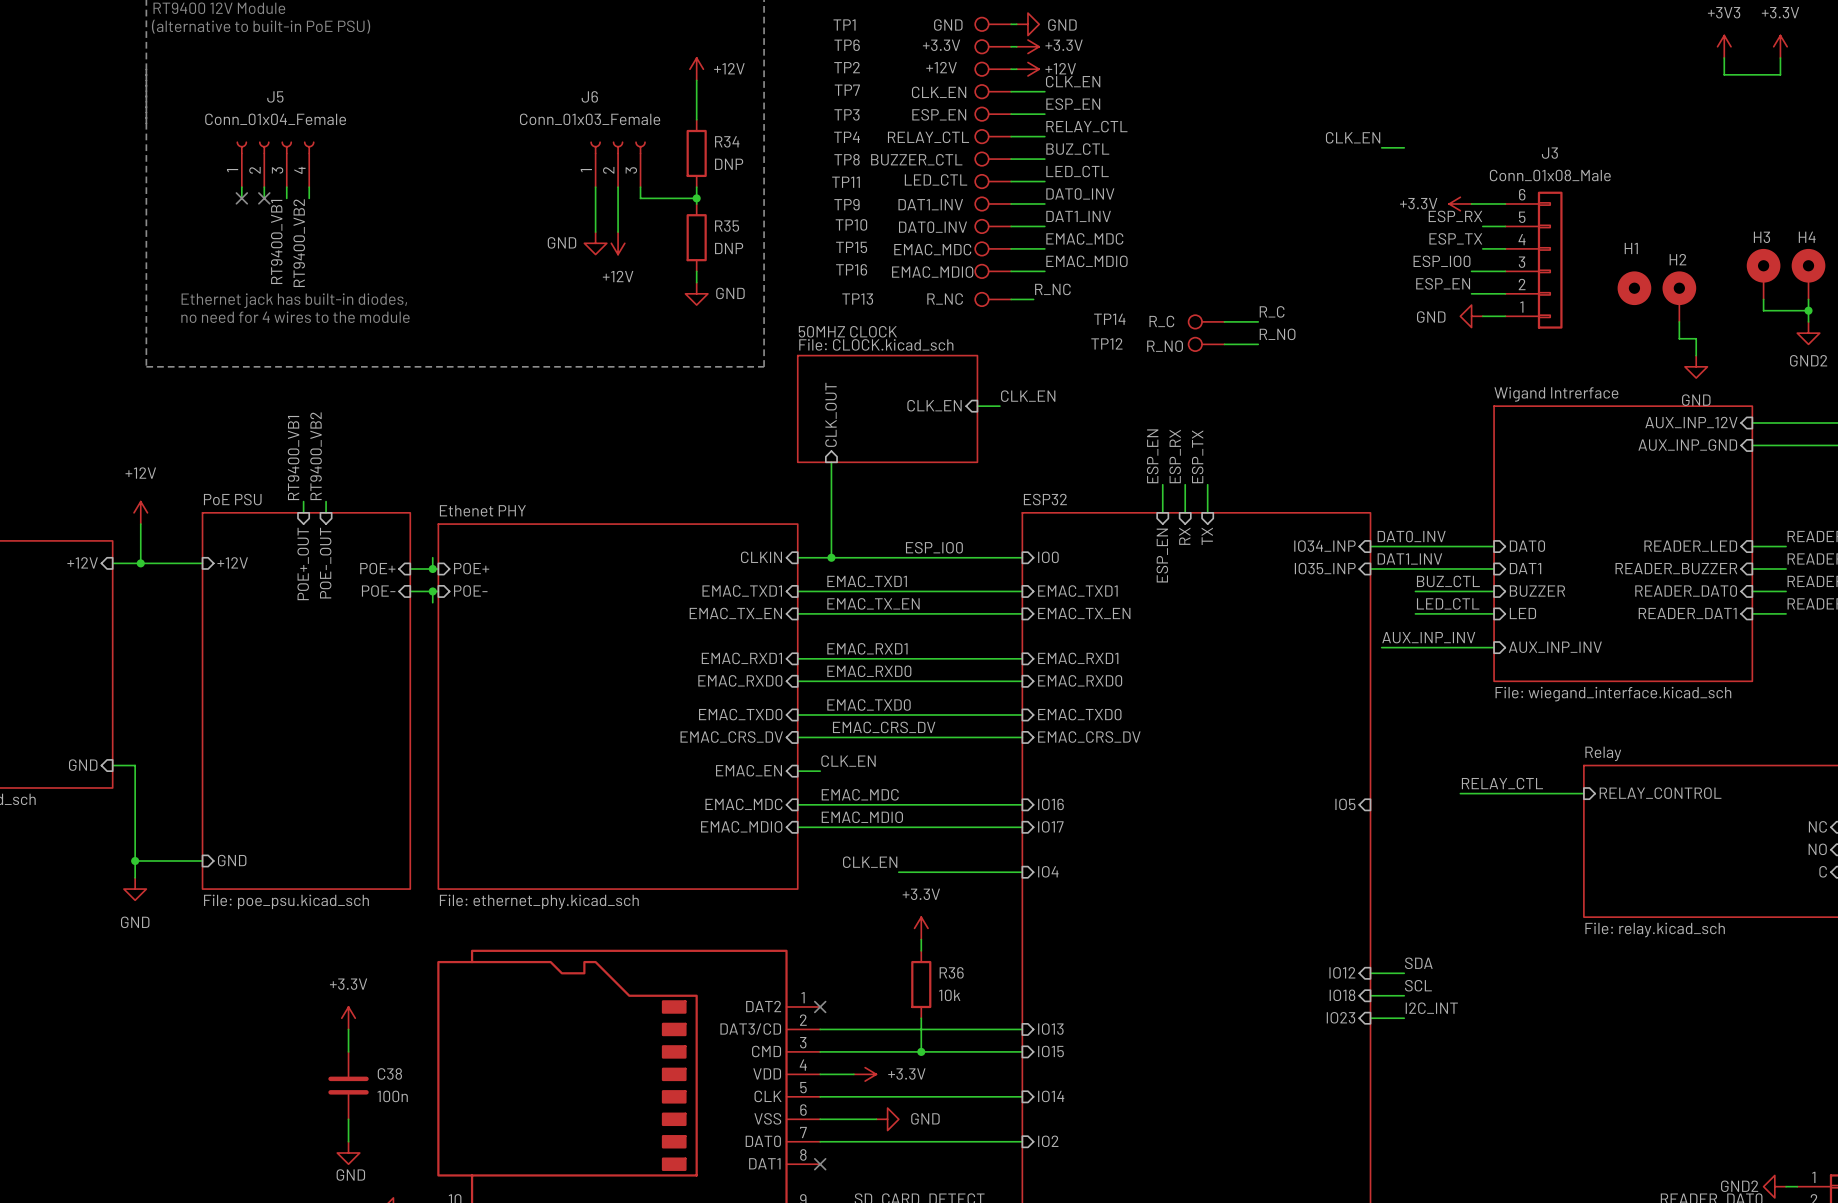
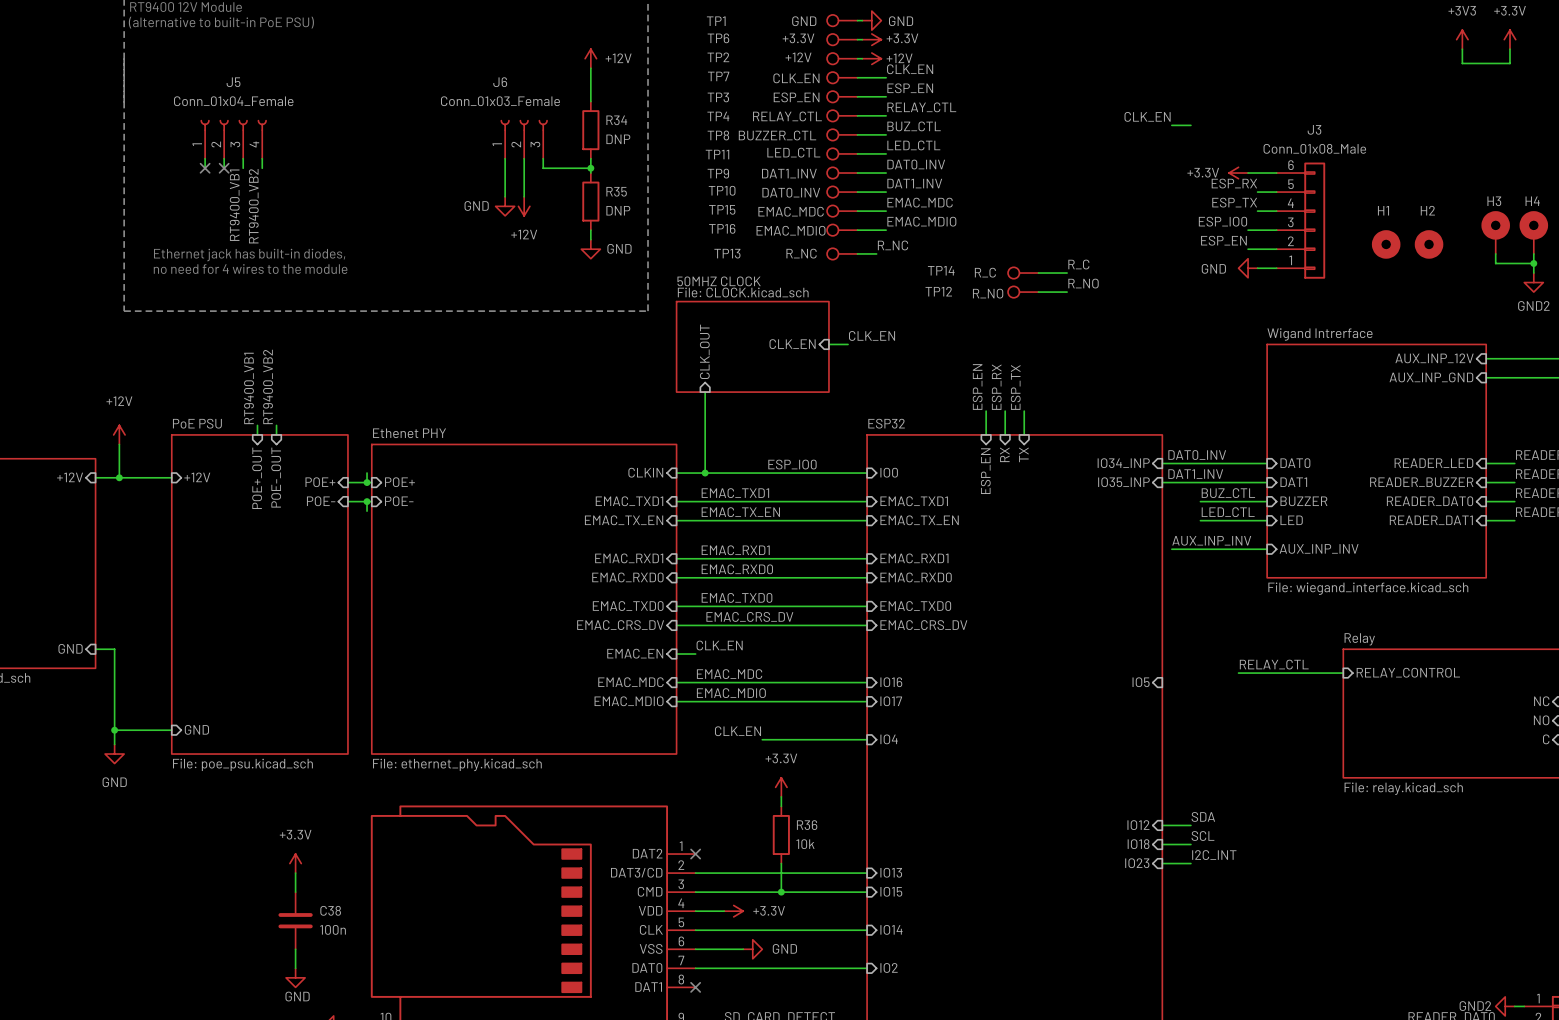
H2 symbol: [1662, 271, 1697, 322] -> [1414, 230, 1444, 259]
wire: (1679, 321) (1679, 338) (1696, 338) (1696, 355) -> none
power symbol: GND (1696, 366) -> none

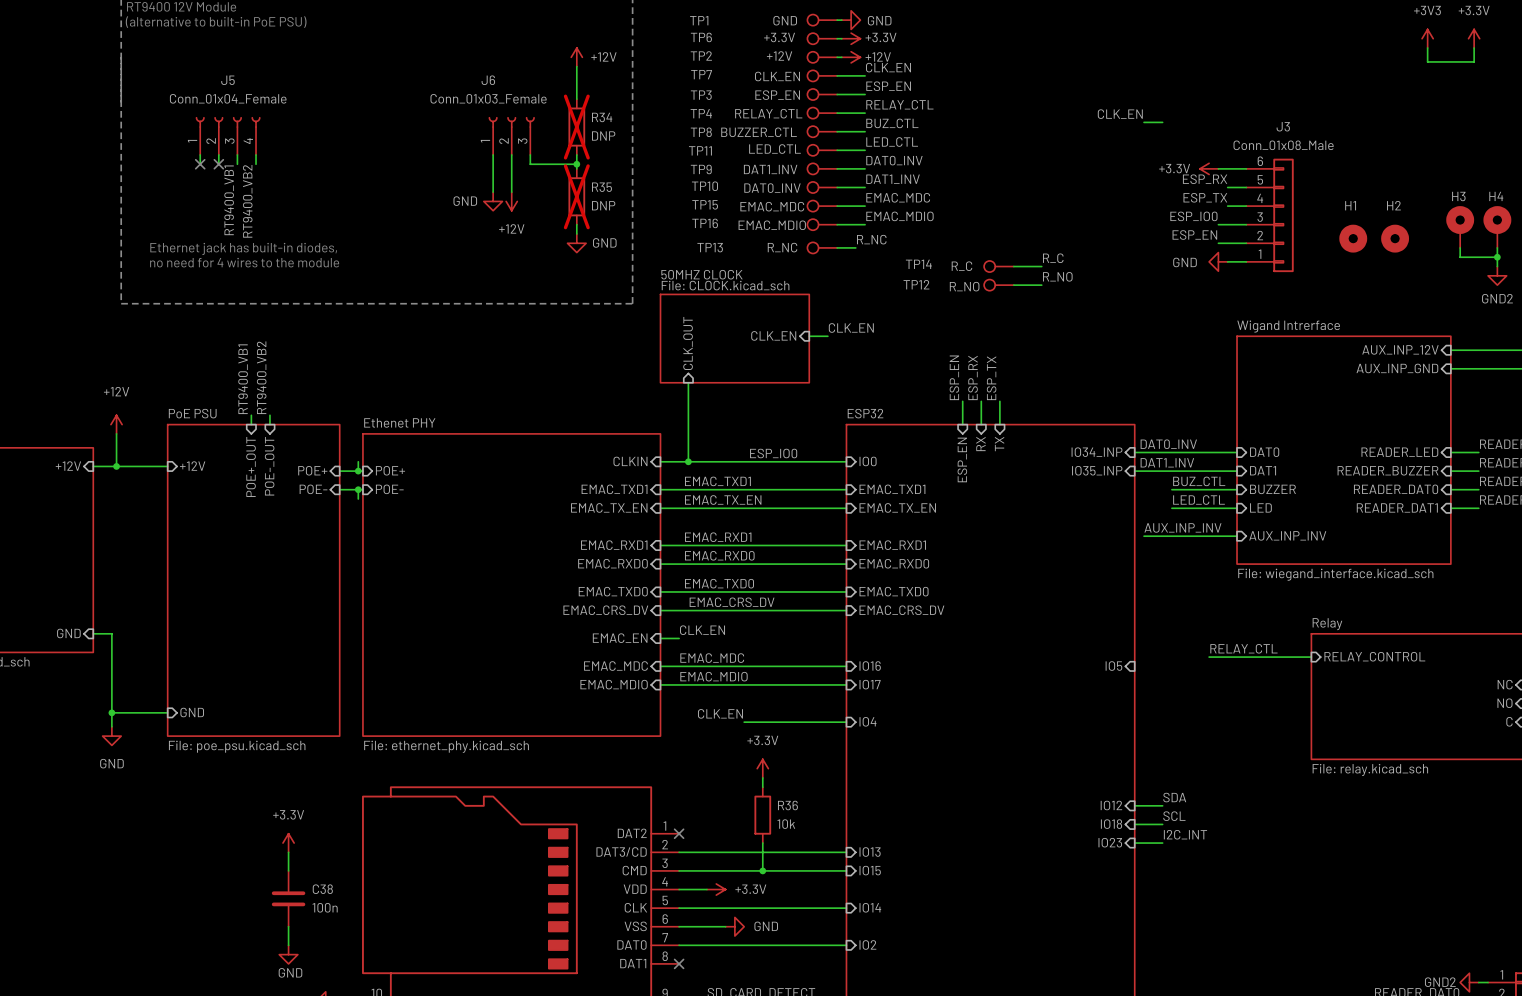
R34 do-not-place cross: none -> (576, 127)
R35 do-not-place cross: none -> (576, 196)

